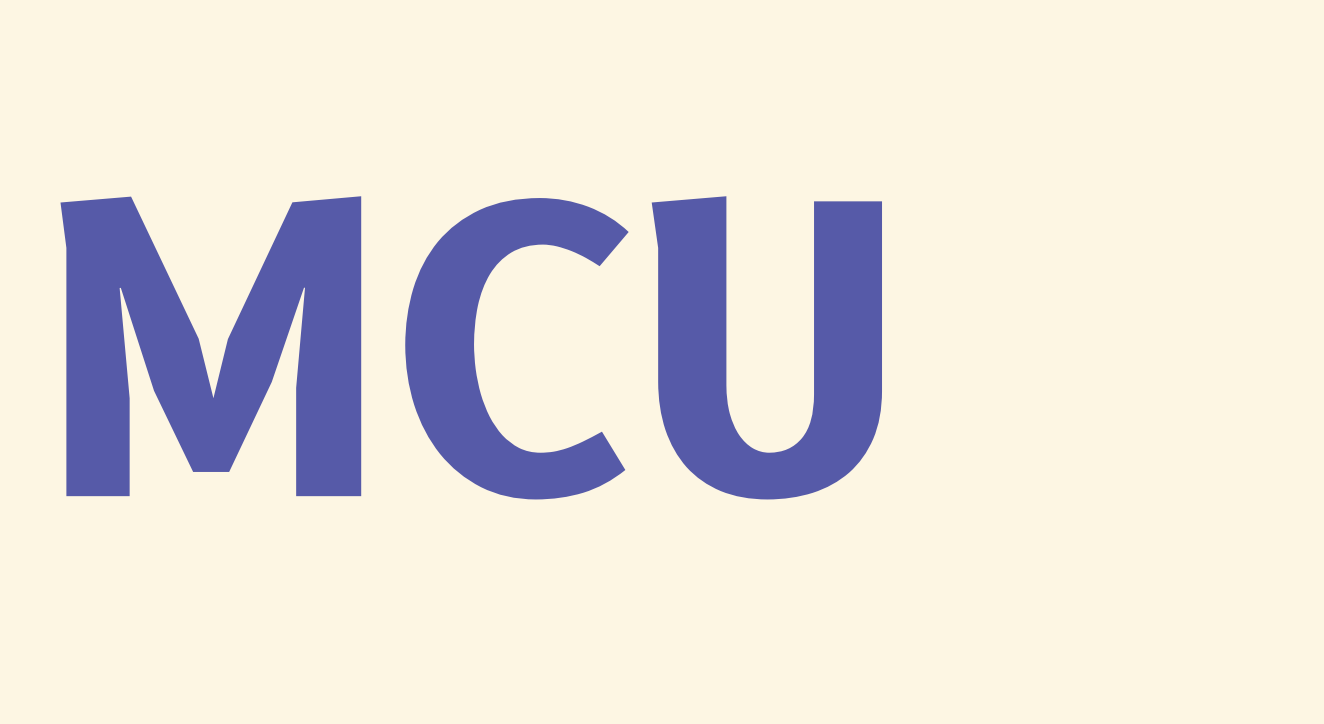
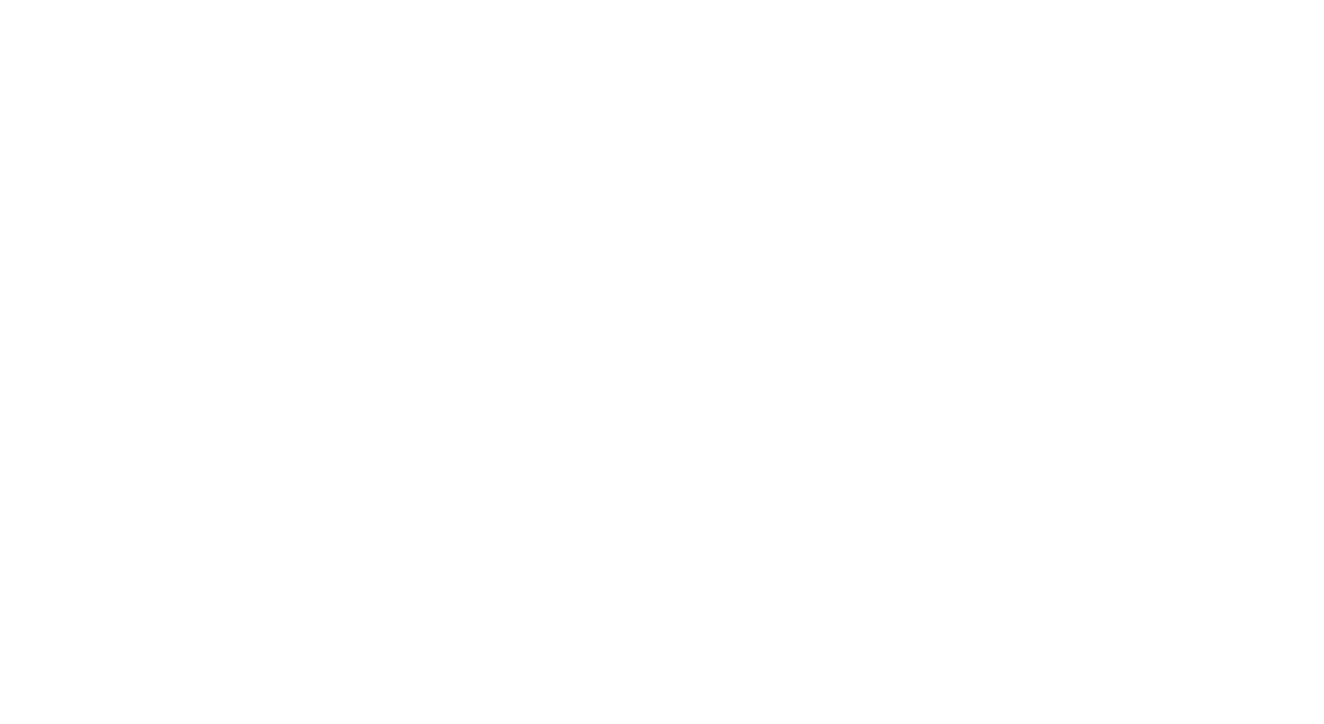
text: MCU (471, 347) -> none

